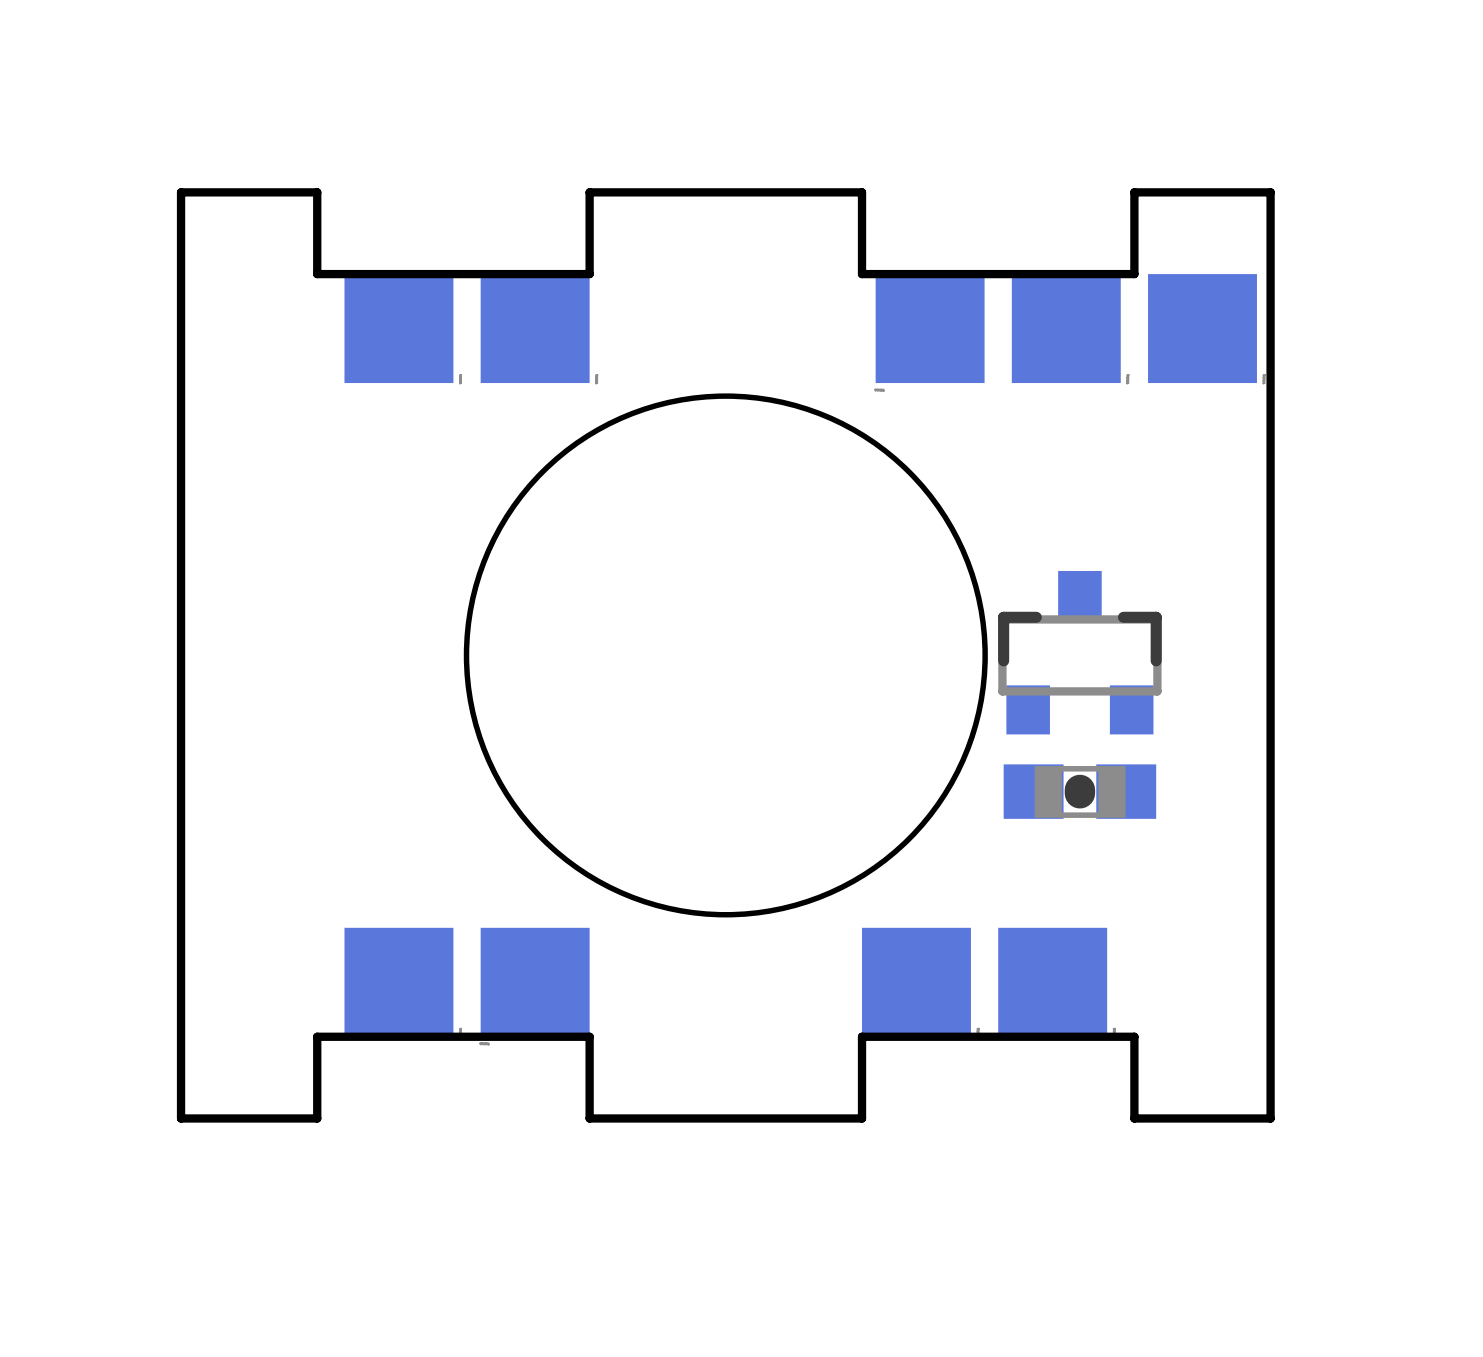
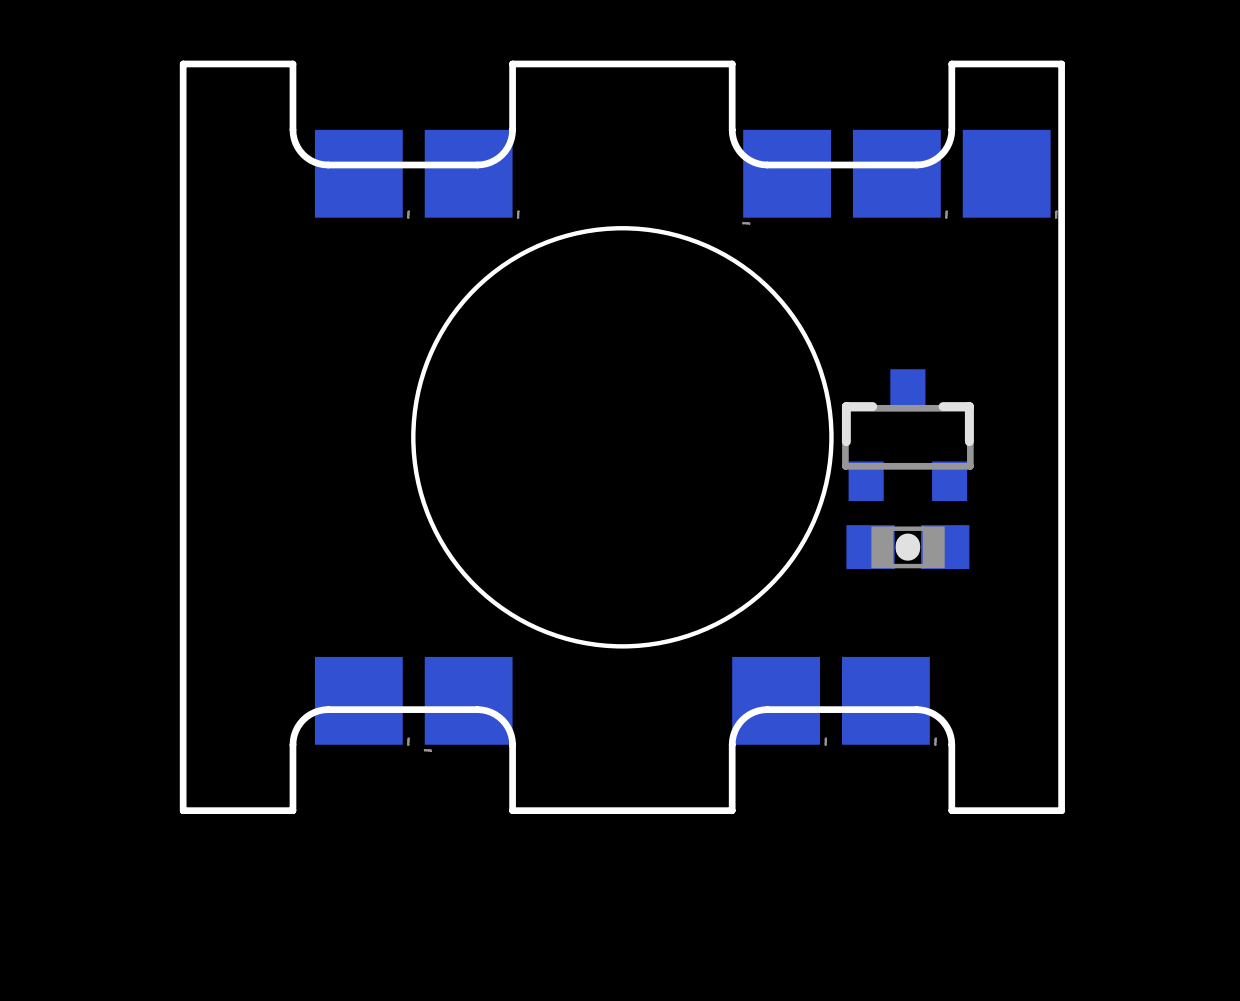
board edge: (589, 274) (317, 274) -> (512, 129) (509, 143) (502, 154) (490, 162) (477, 164) (323, 164) (310, 160) (303, 154) (295, 143) (292, 129)
board edge: (1134, 274) (862, 274) -> (951, 129) (949, 143) (941, 154) (930, 162) (916, 164) (762, 164) (749, 160) (742, 154) (734, 143) (732, 129)
board edge: (589, 1036) (317, 1036) -> (512, 744) (509, 731) (502, 719) (490, 712) (477, 709) (323, 709) (310, 714) (303, 719) (295, 731) (292, 744)
board edge: (1134, 1036) (862, 1036) -> (951, 744) (949, 731) (941, 719) (930, 712) (916, 709) (762, 709) (749, 714) (742, 719) (734, 731) (732, 744)

